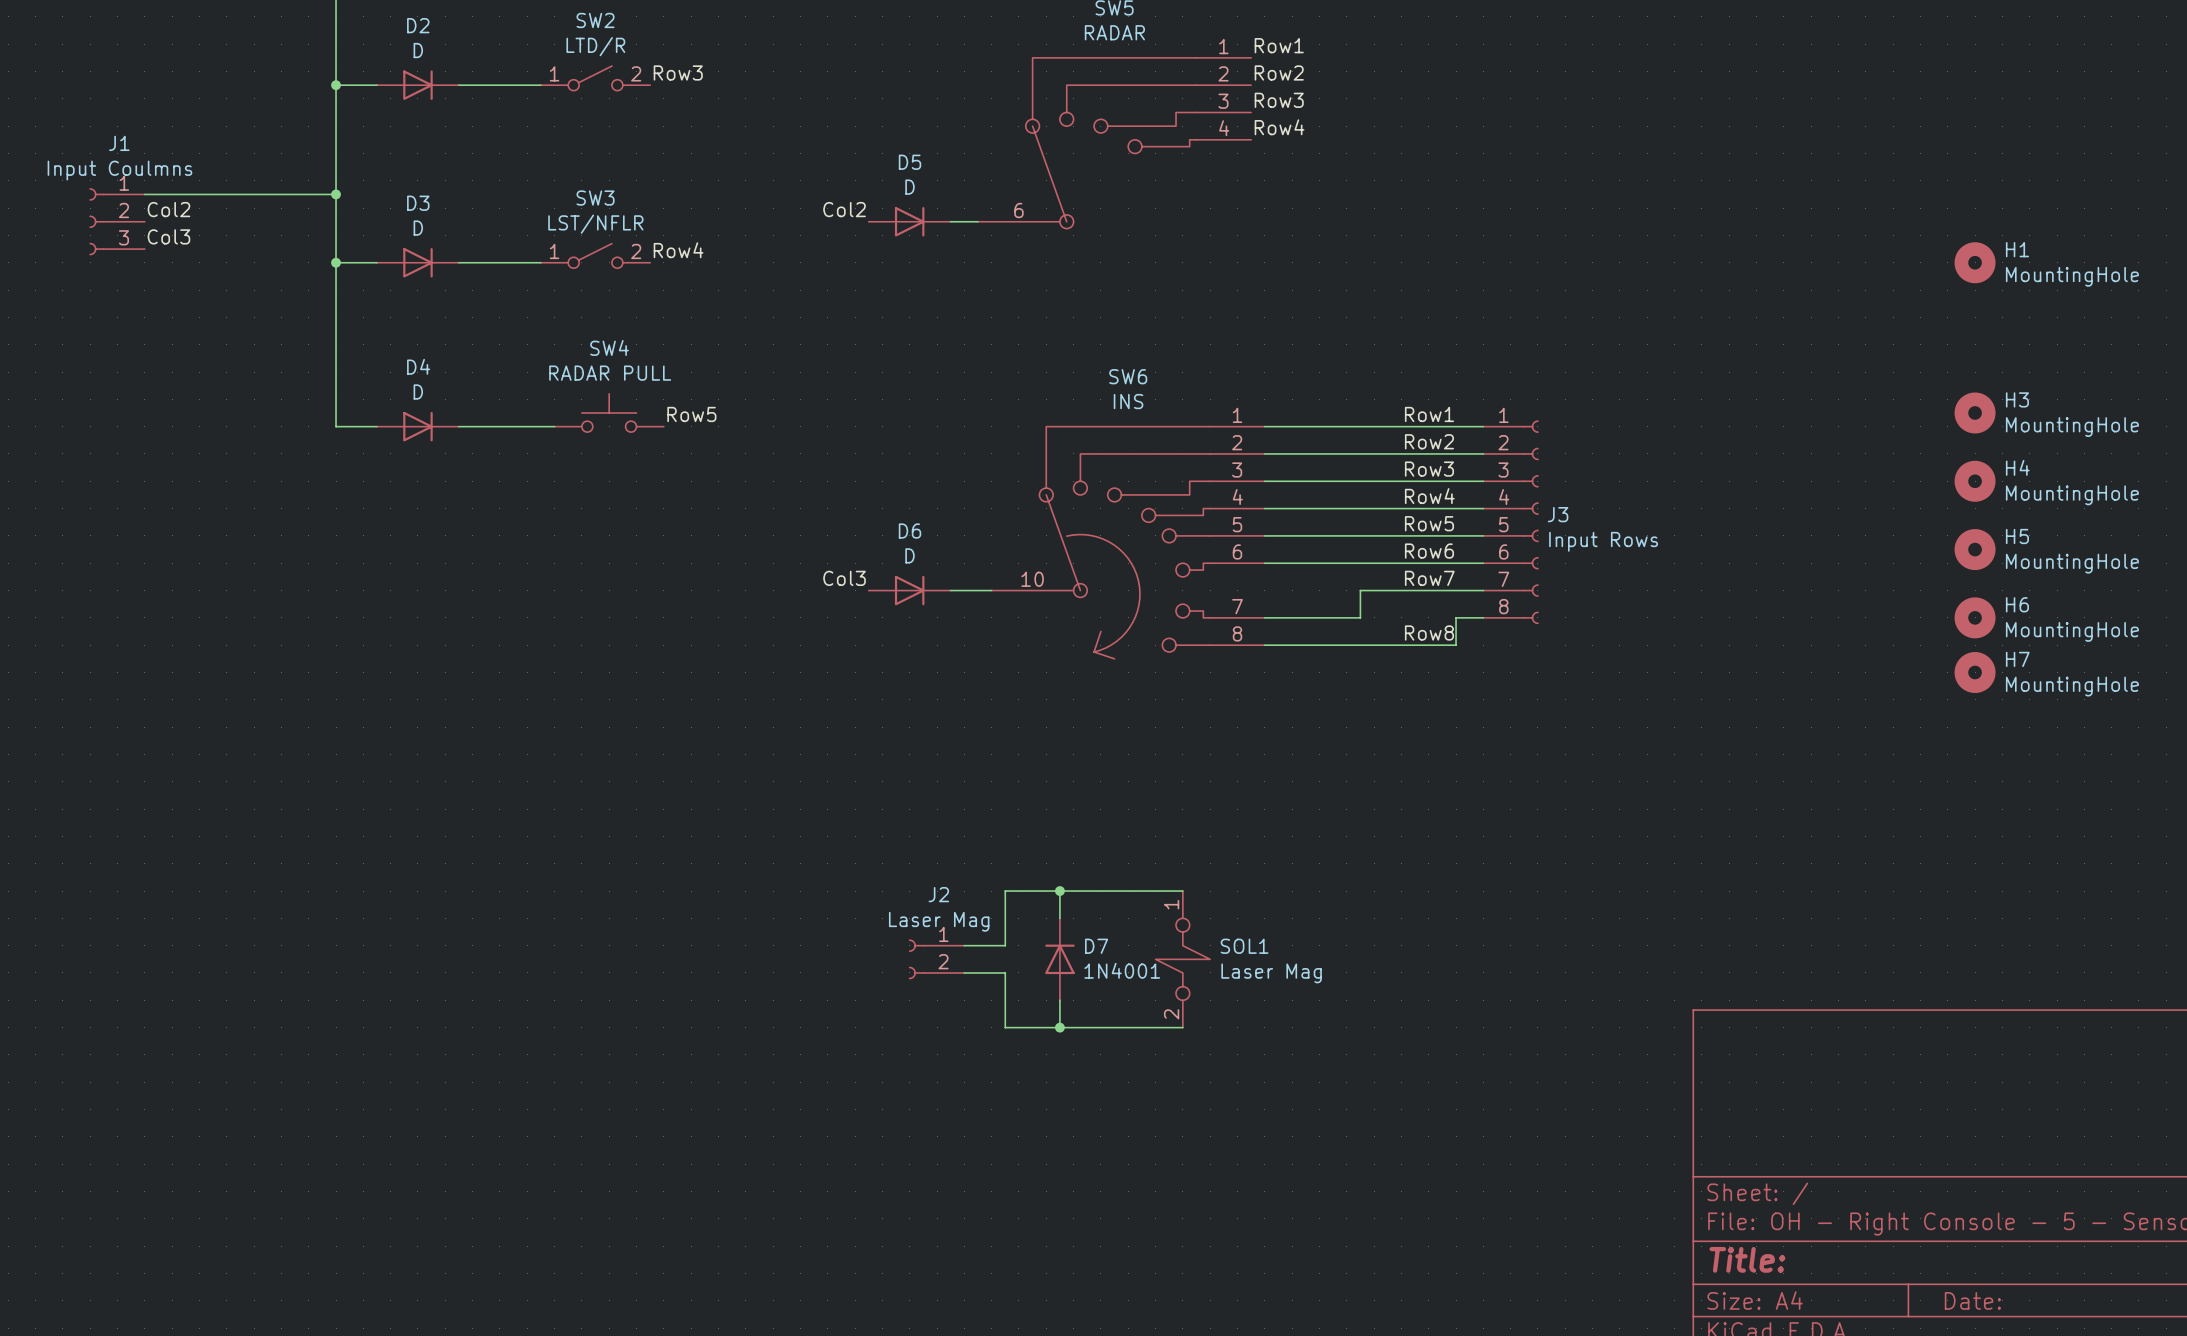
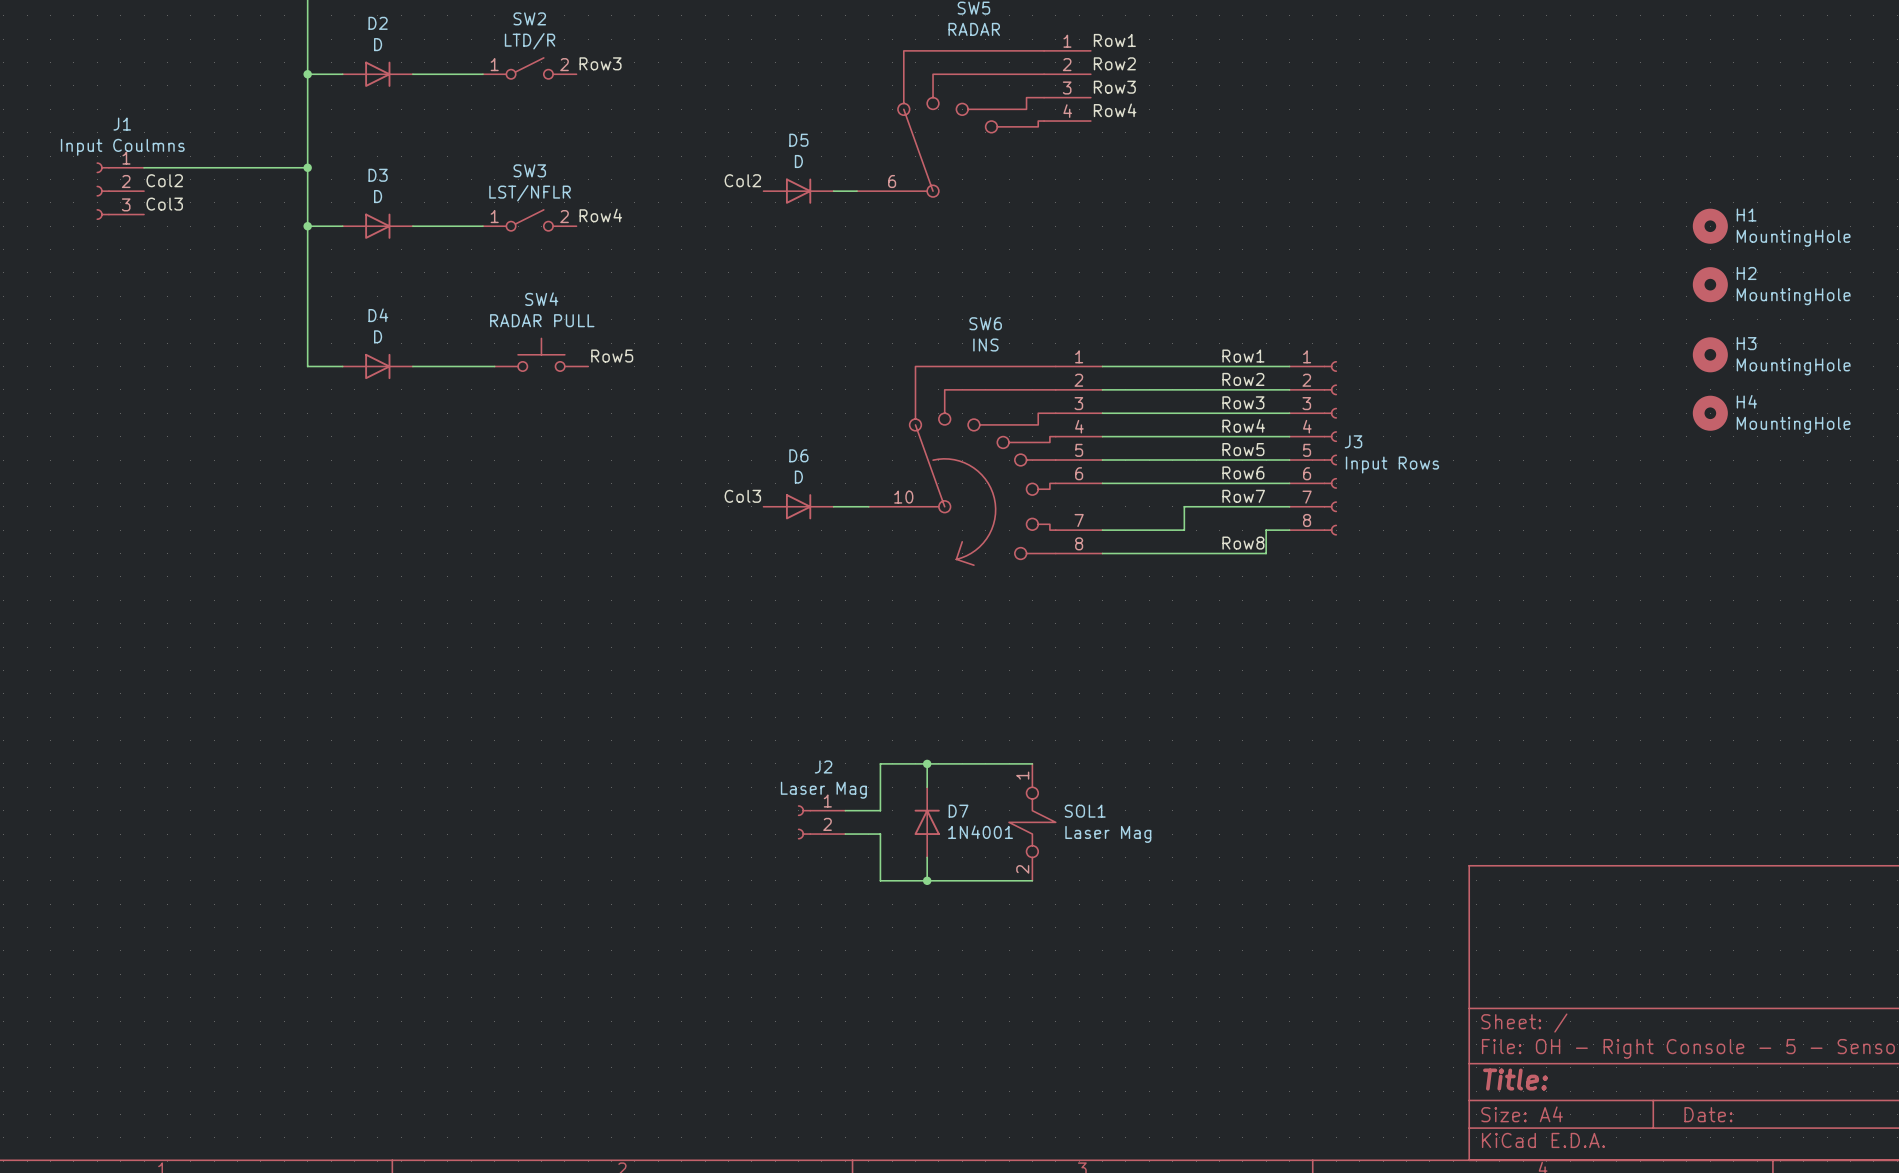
H2: none -> MountingHole (1710, 284)
H5: MountingHole (1975, 549) -> none
H6: MountingHole (1975, 617) -> none
H7: MountingHole (1975, 672) -> none

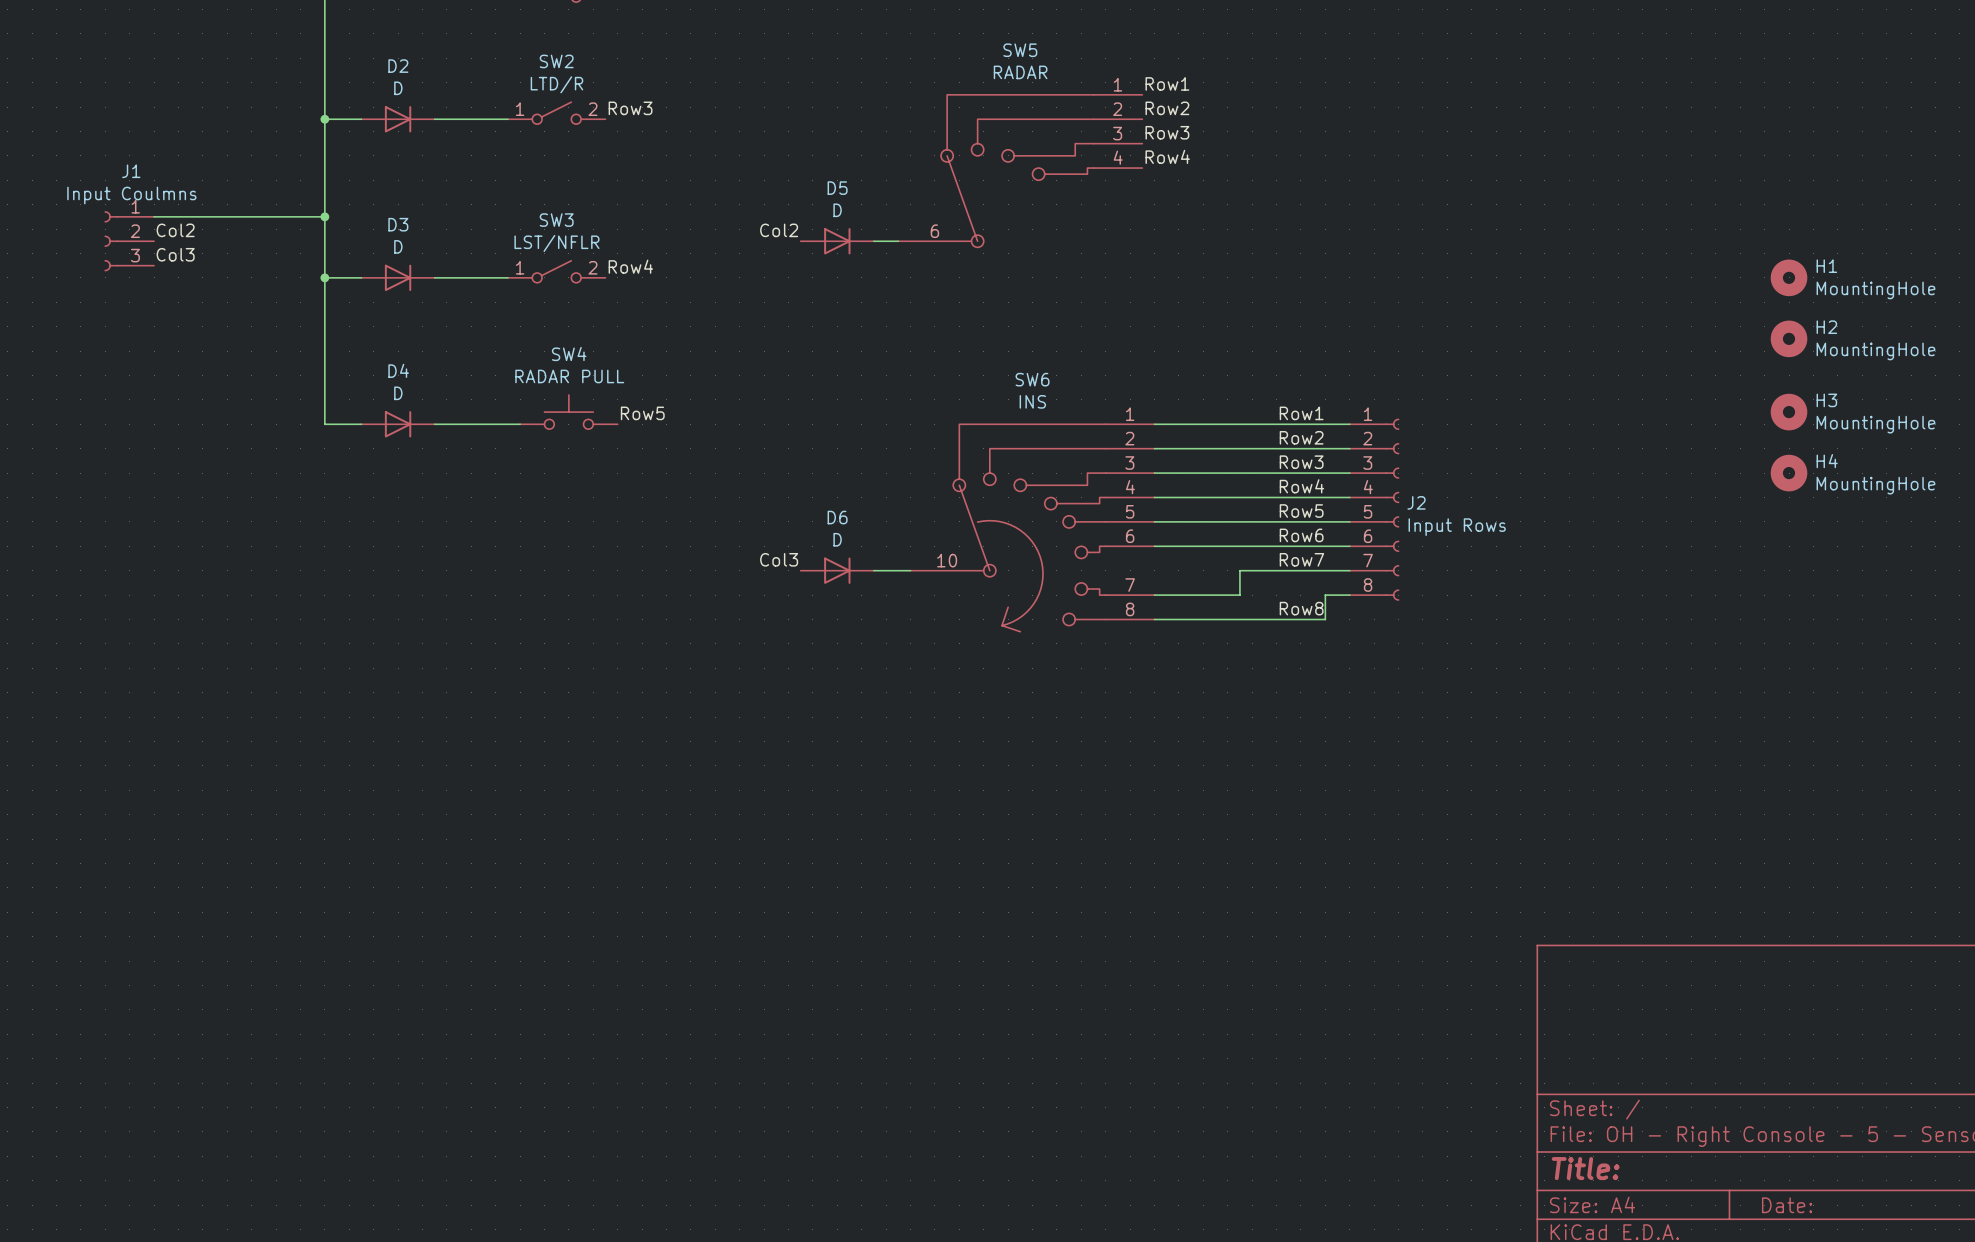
J3 name: J3 (1353, 441) -> J2 (1416, 502)
wire: (927, 763) (927, 787) -> none
junction: (927, 763) -> none
wire: (1032, 763) (880, 763) (880, 810) (845, 810) -> none
J2: Laser Mag (821, 822) -> none
D7: 1N4001 (927, 822) -> none
SOL1: Laser Mag (1032, 822) -> none
wire: (845, 834) (880, 834) (880, 880) (1032, 880) -> none
wire: (927, 857) (927, 880) -> none
junction: (927, 880) -> none

